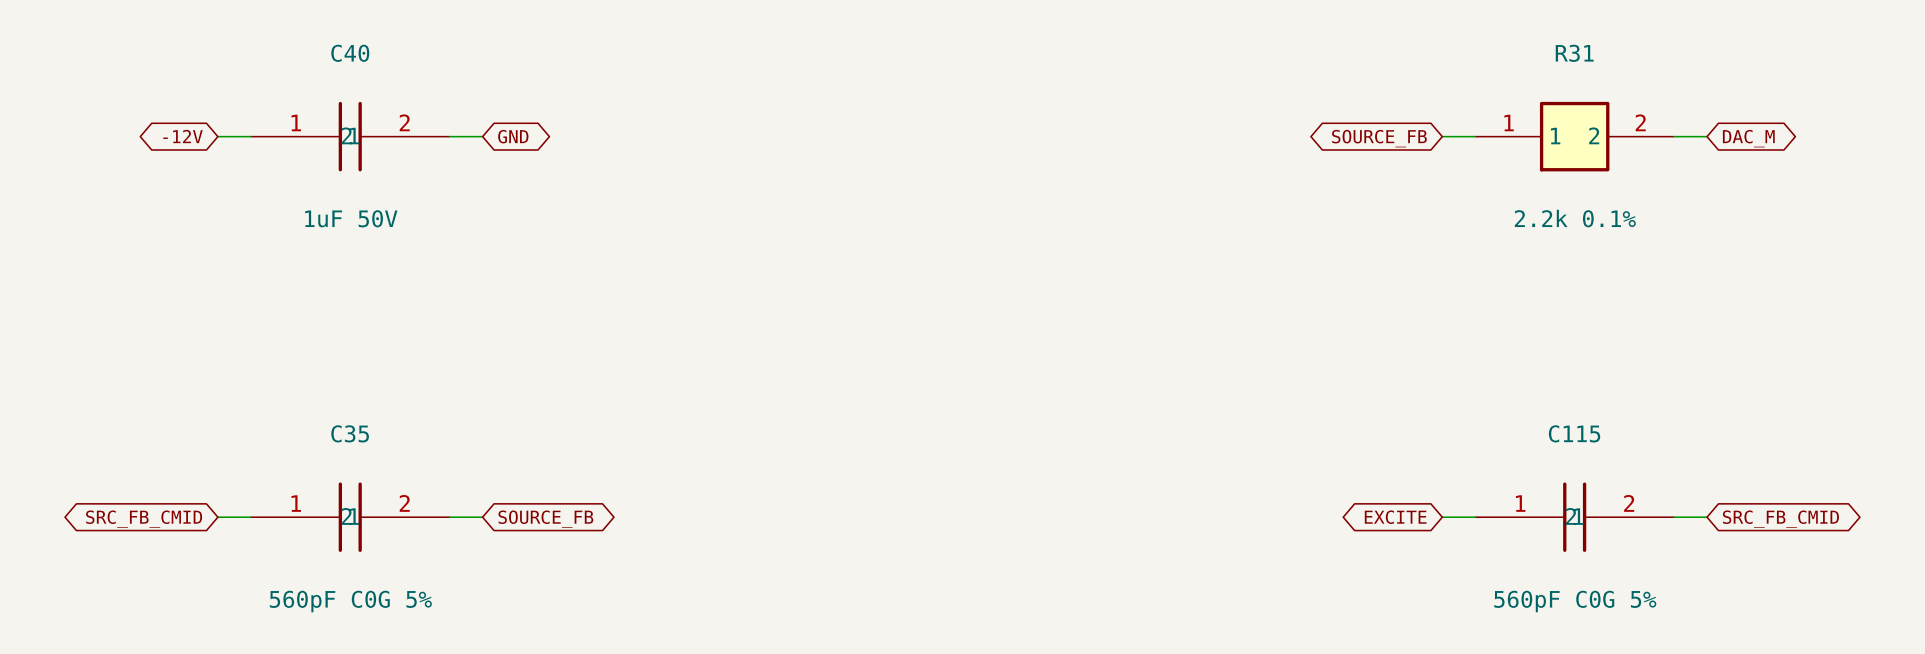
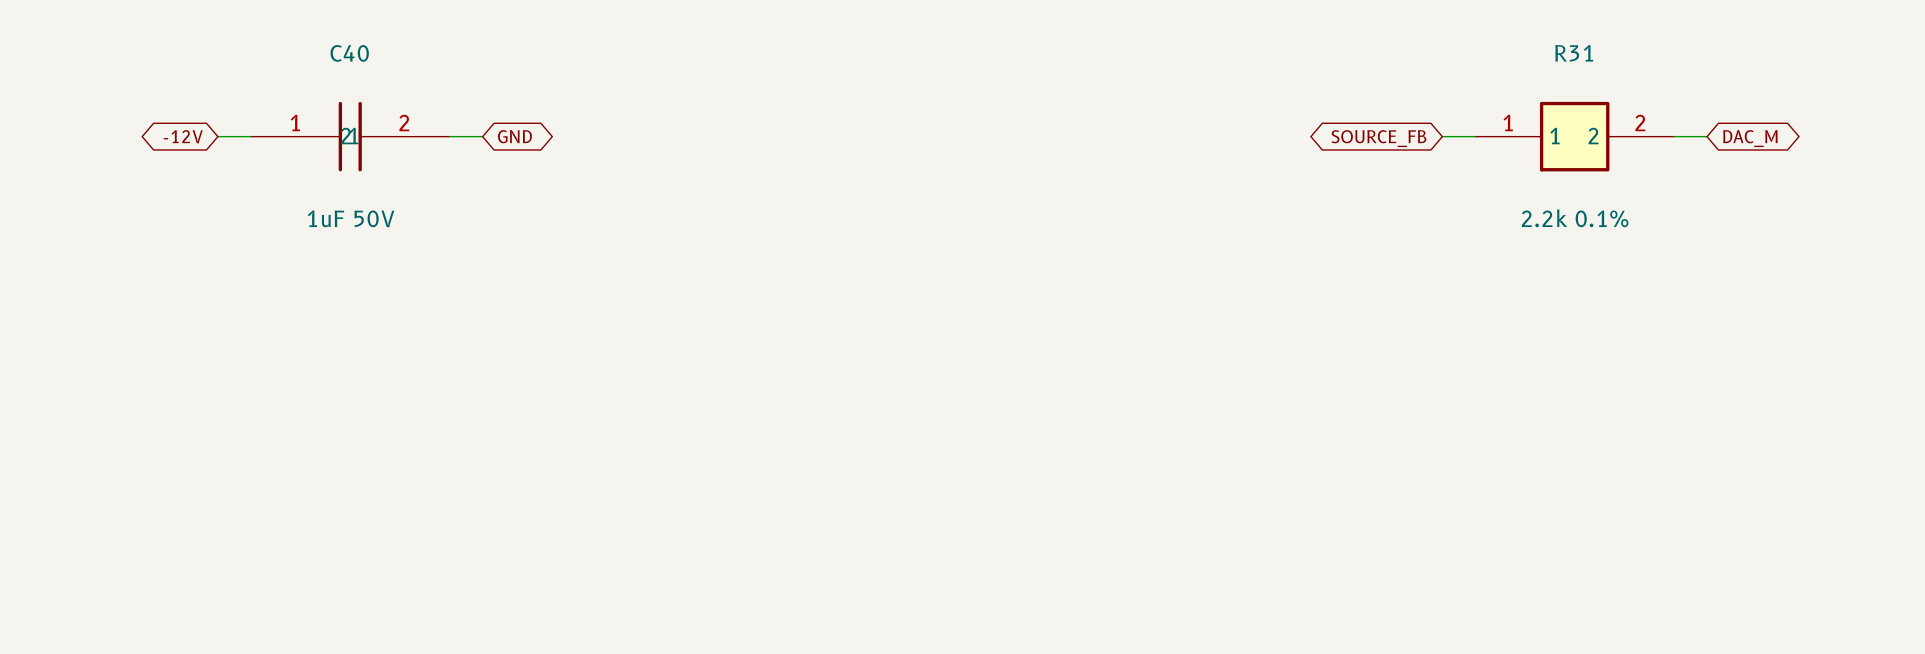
wire: (217, 517) (250, 517) -> none
C35: 560pF C0G 5% (350, 517) -> none
wire: (449, 517) (482, 517) -> none
global label: EXCITE (1395, 517) -> none
wire: (1442, 517) (1475, 517) -> none
C115: 560pF C0G 5% (1574, 517) -> none
wire: (1673, 517) (1707, 517) -> none
global label: SRC_FB_CMID (144, 519) -> none
global label: SOURCE_FB (545, 519) -> none
global label: SRC_FB_CMID (1780, 519) -> none

